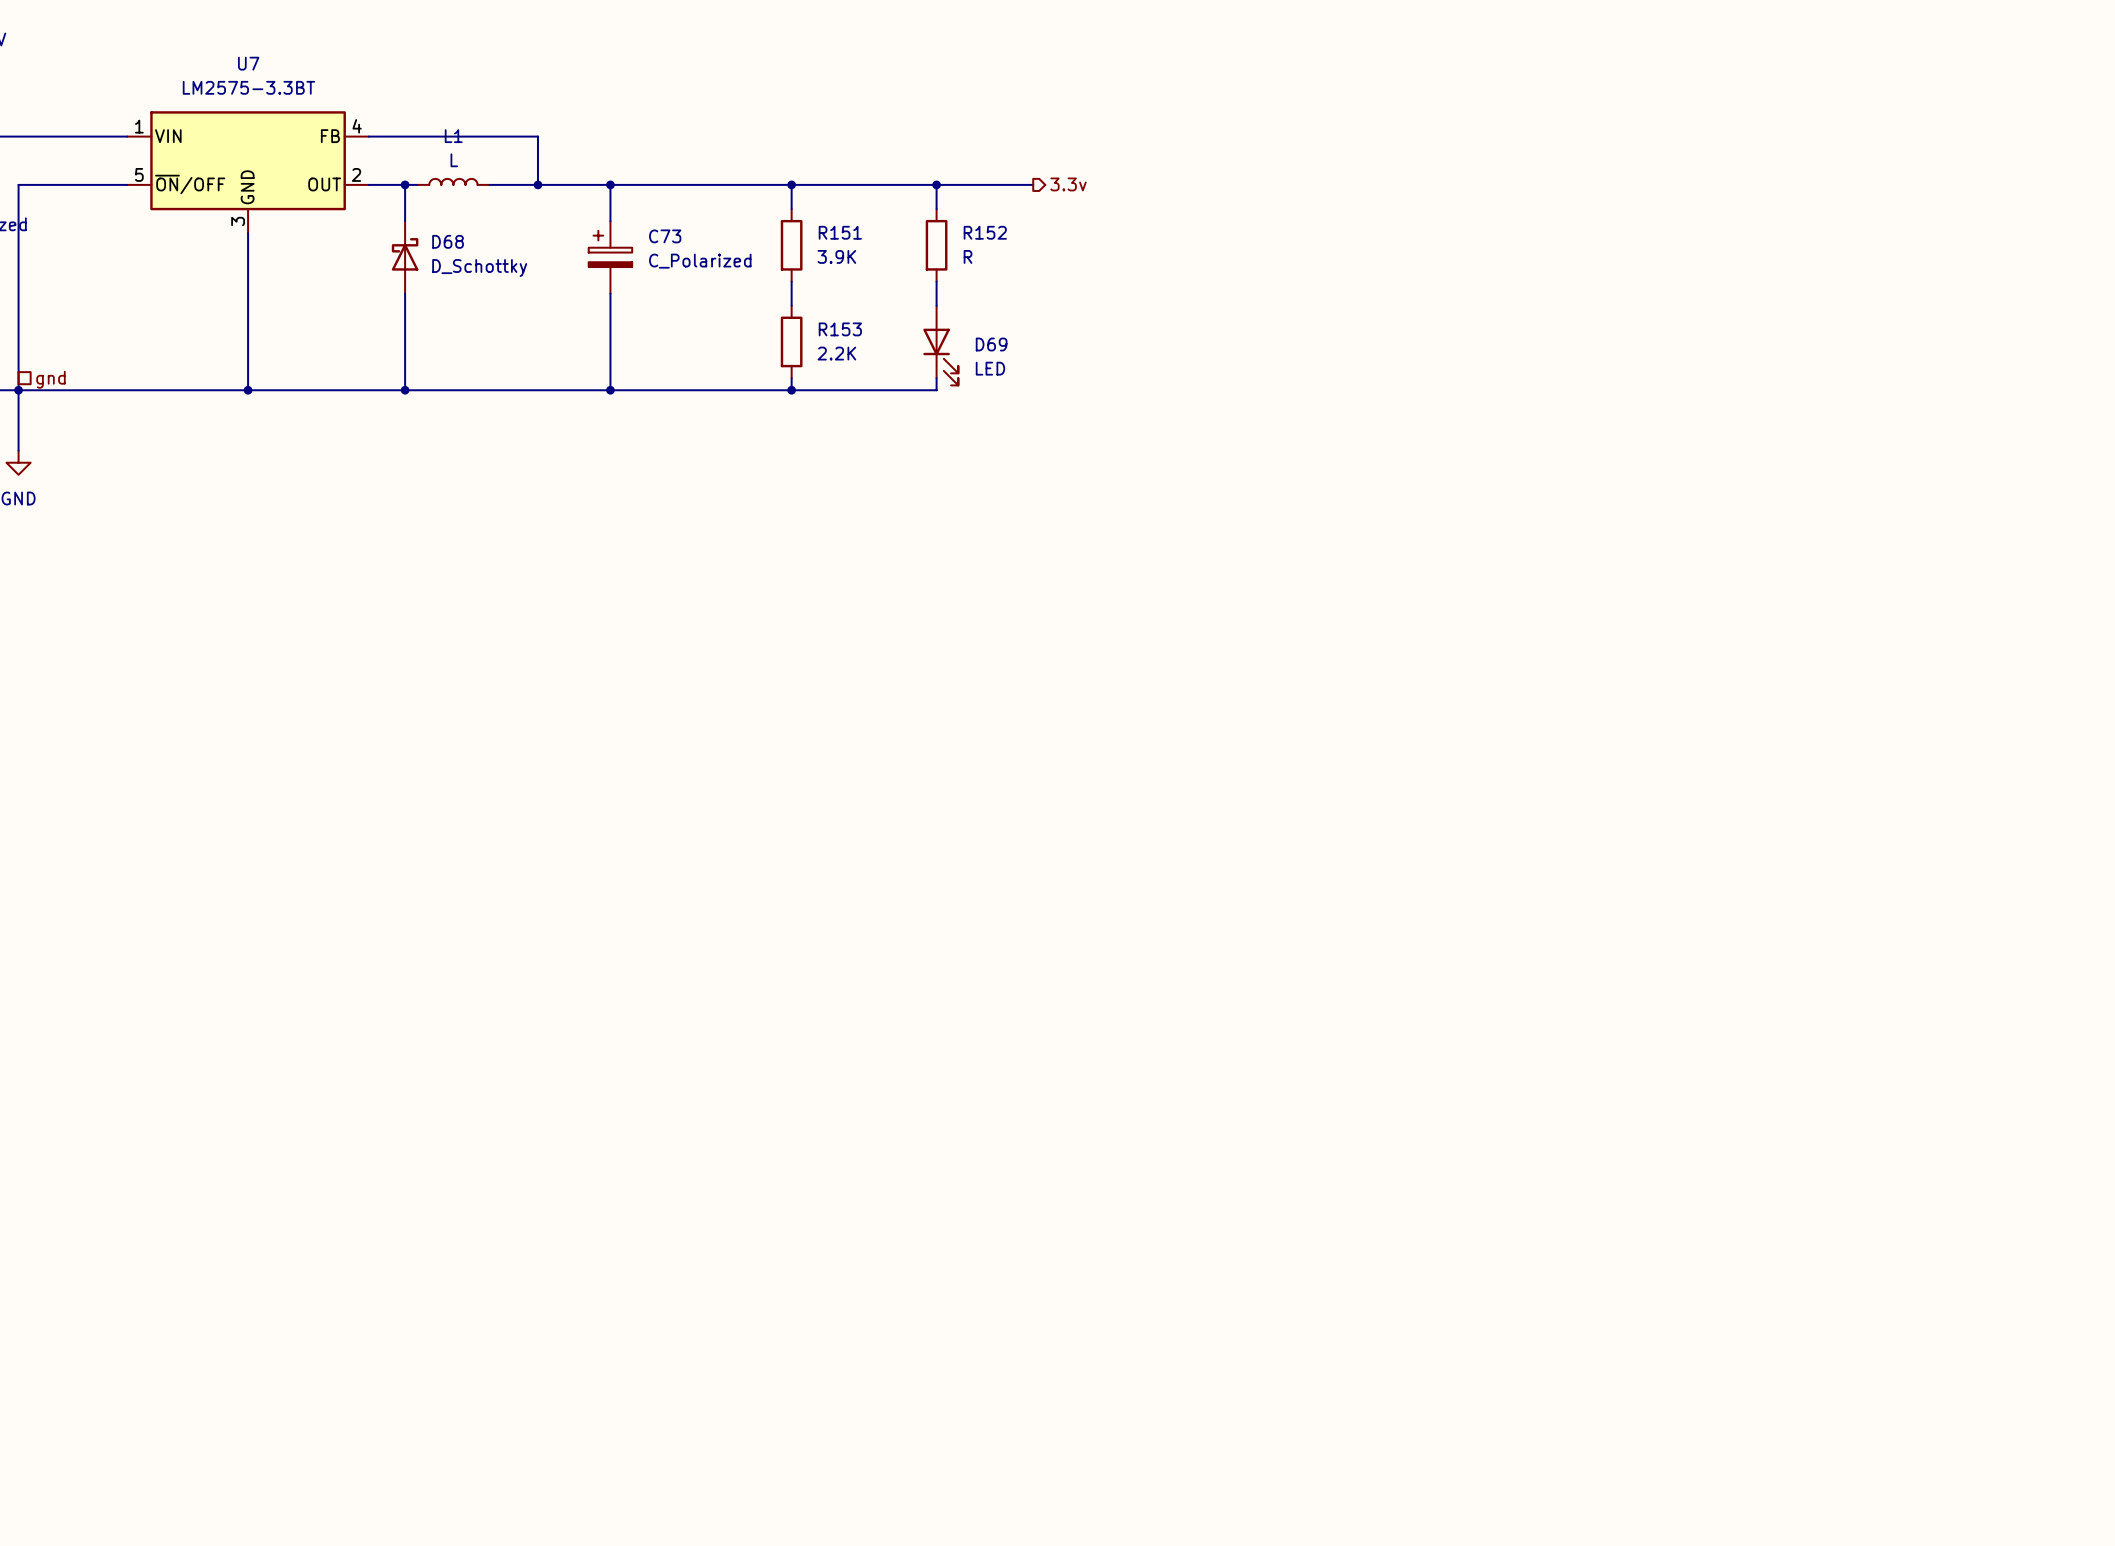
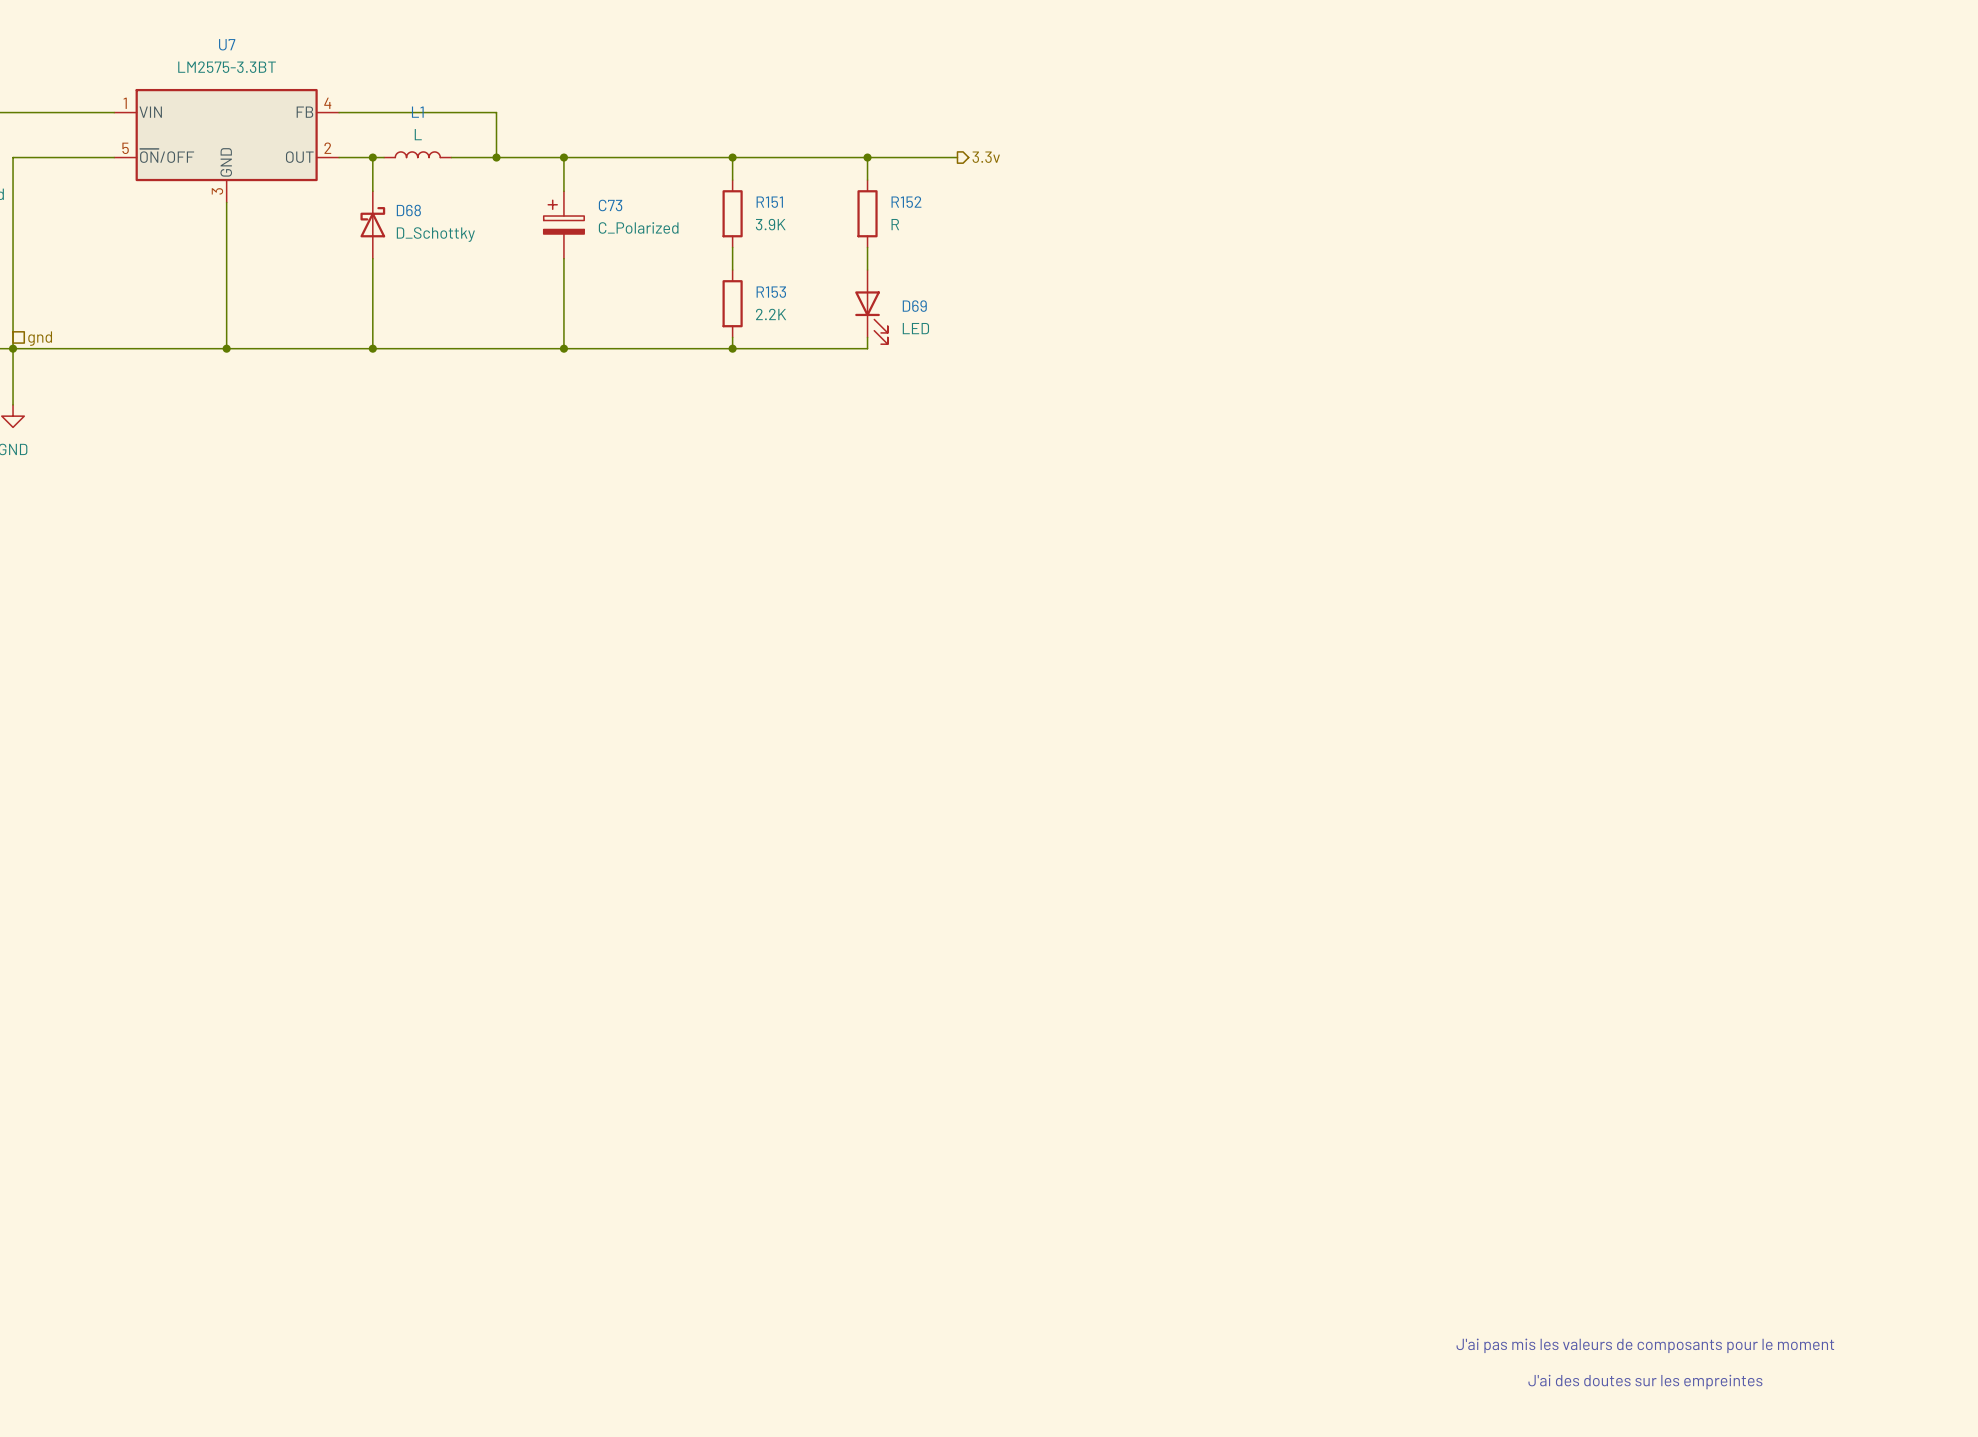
text: none -> J'ai pas mis les valeurs de composants pour le moment (1645, 1345)
text: none -> J'ai des doutes sur les empreintes (1645, 1382)

